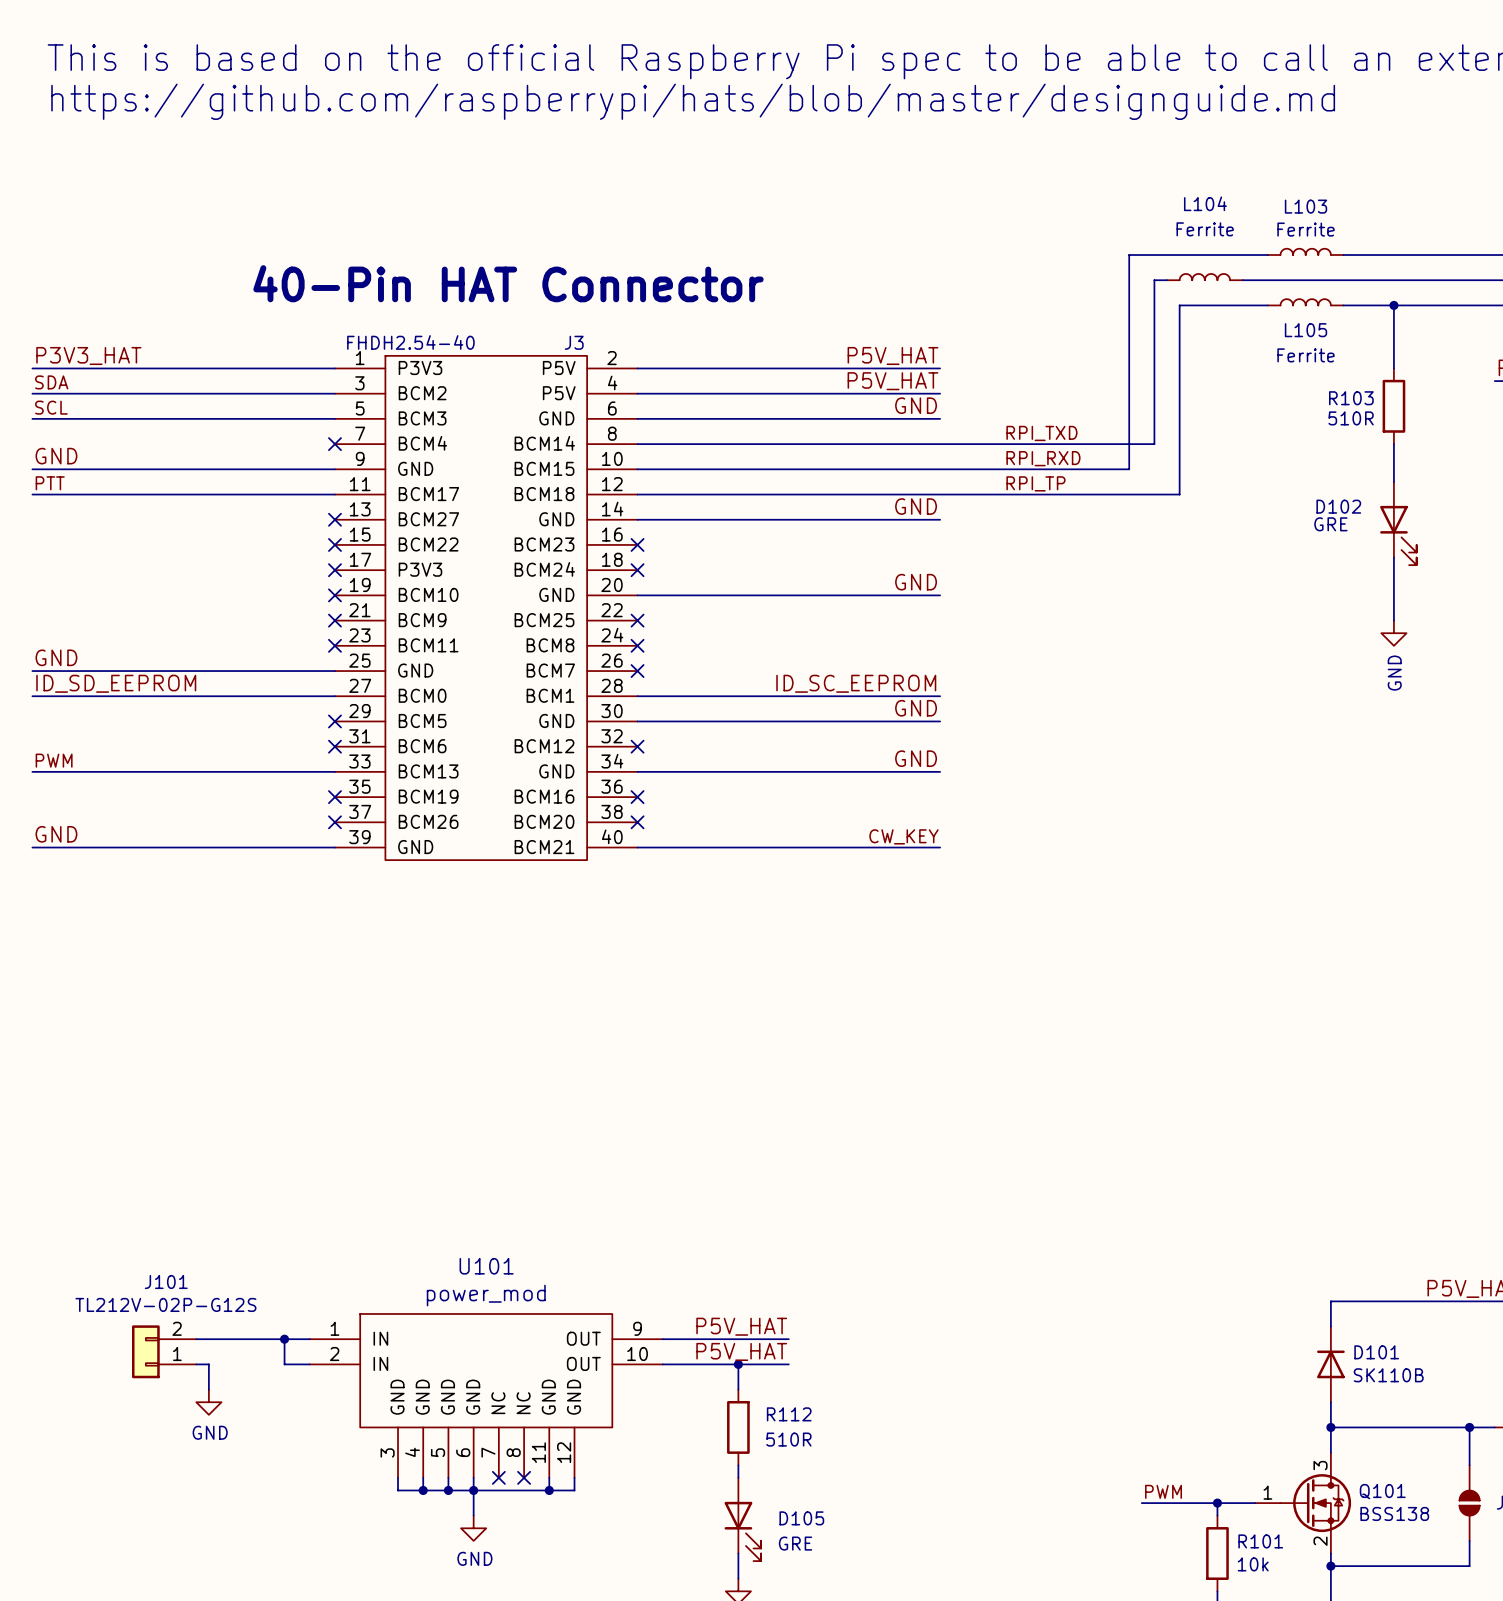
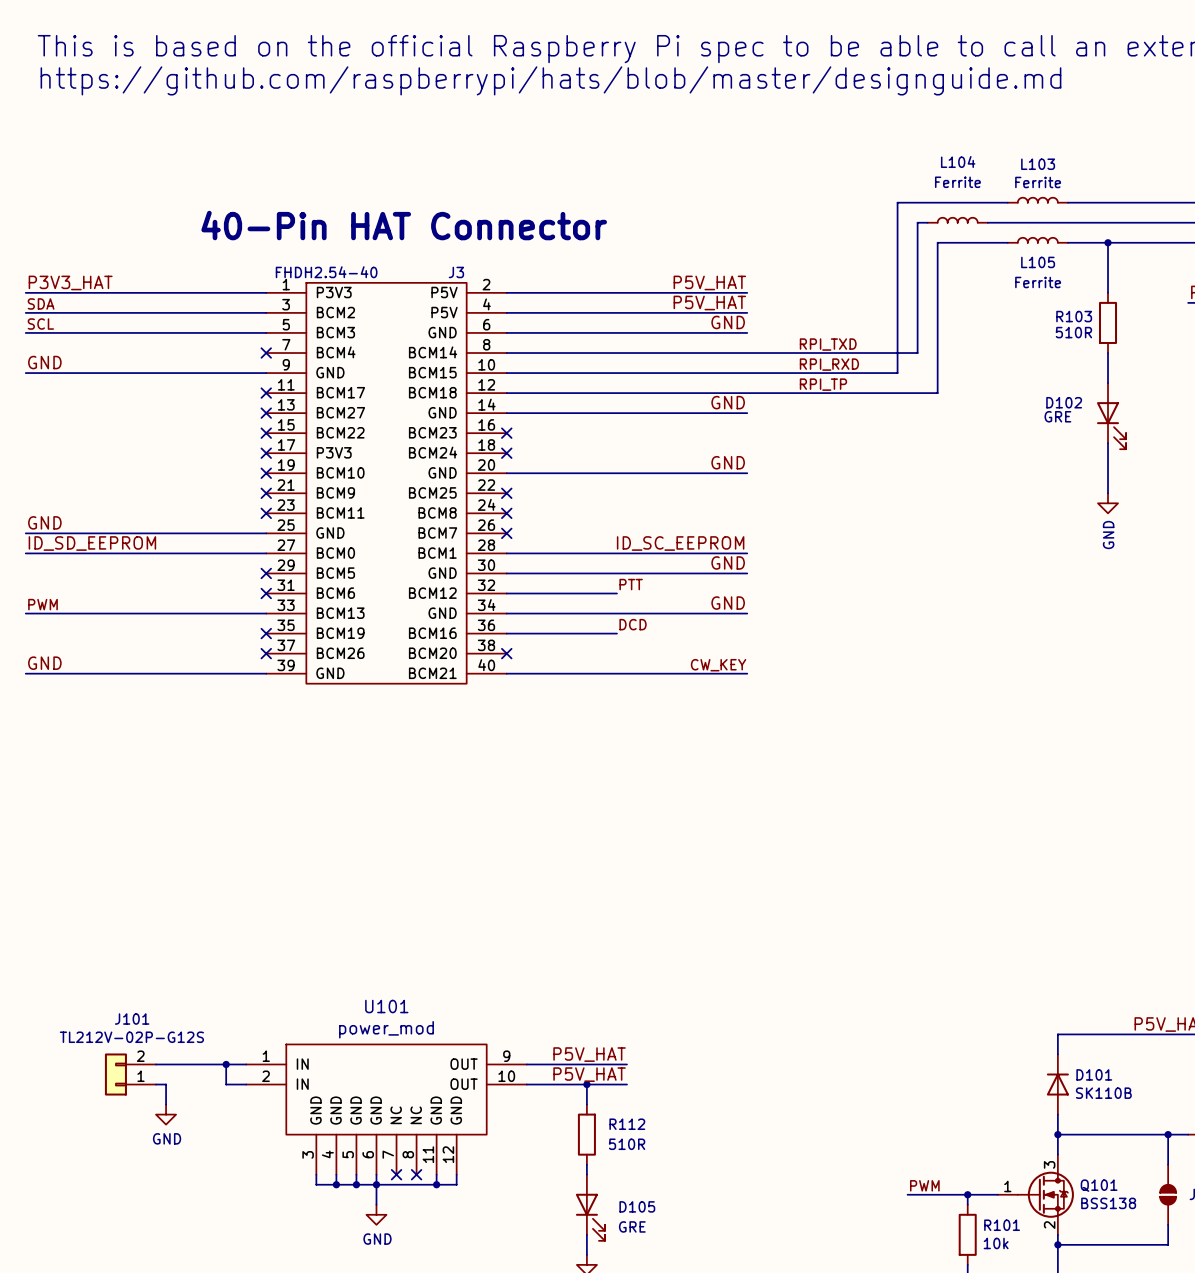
label: PTT (50, 483) -> none
wire: (32, 494) (334, 494) -> none
no-connect mark: none -> (266, 393)
label: none -> PTT (631, 584)
wire: none -> (506, 593) (616, 593)
no-connect mark: (637, 746) -> none
label: none -> DCD (633, 624)
wire: none -> (506, 633) (616, 633)
no-connect mark: (637, 797) -> none

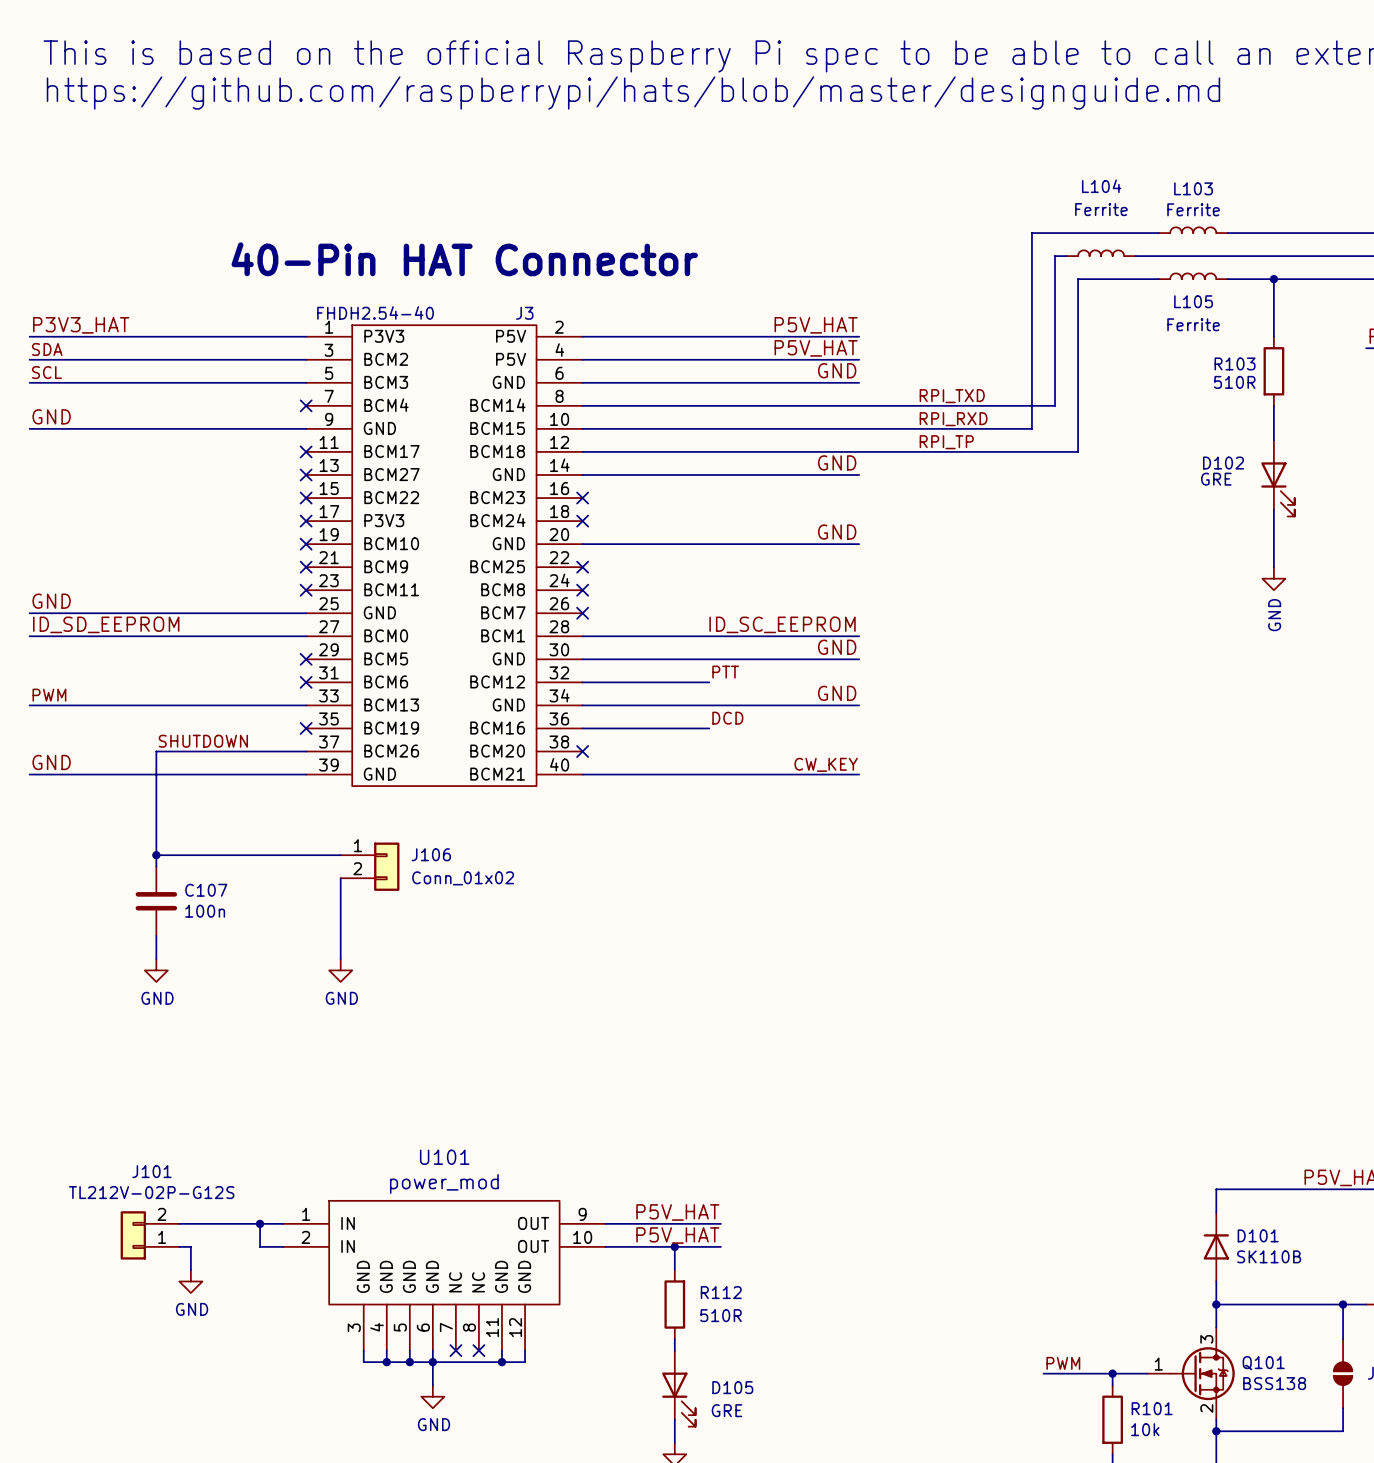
label: none -> SHUTDOWN (203, 741)
wire: none -> (306, 751) (156, 751) (156, 866)
no-connect mark: (266, 653) -> none
wire: none -> (156, 855) (340, 855)
junction: none -> (156, 855)
J106: none -> Conn_01x02 (370, 866)
wire: none -> (340, 878) (340, 958)
C107: none -> 100n (156, 901)
wire: none -> (156, 935) (156, 958)
power symbol: none -> GND (156, 970)
power symbol: none -> GND (340, 970)

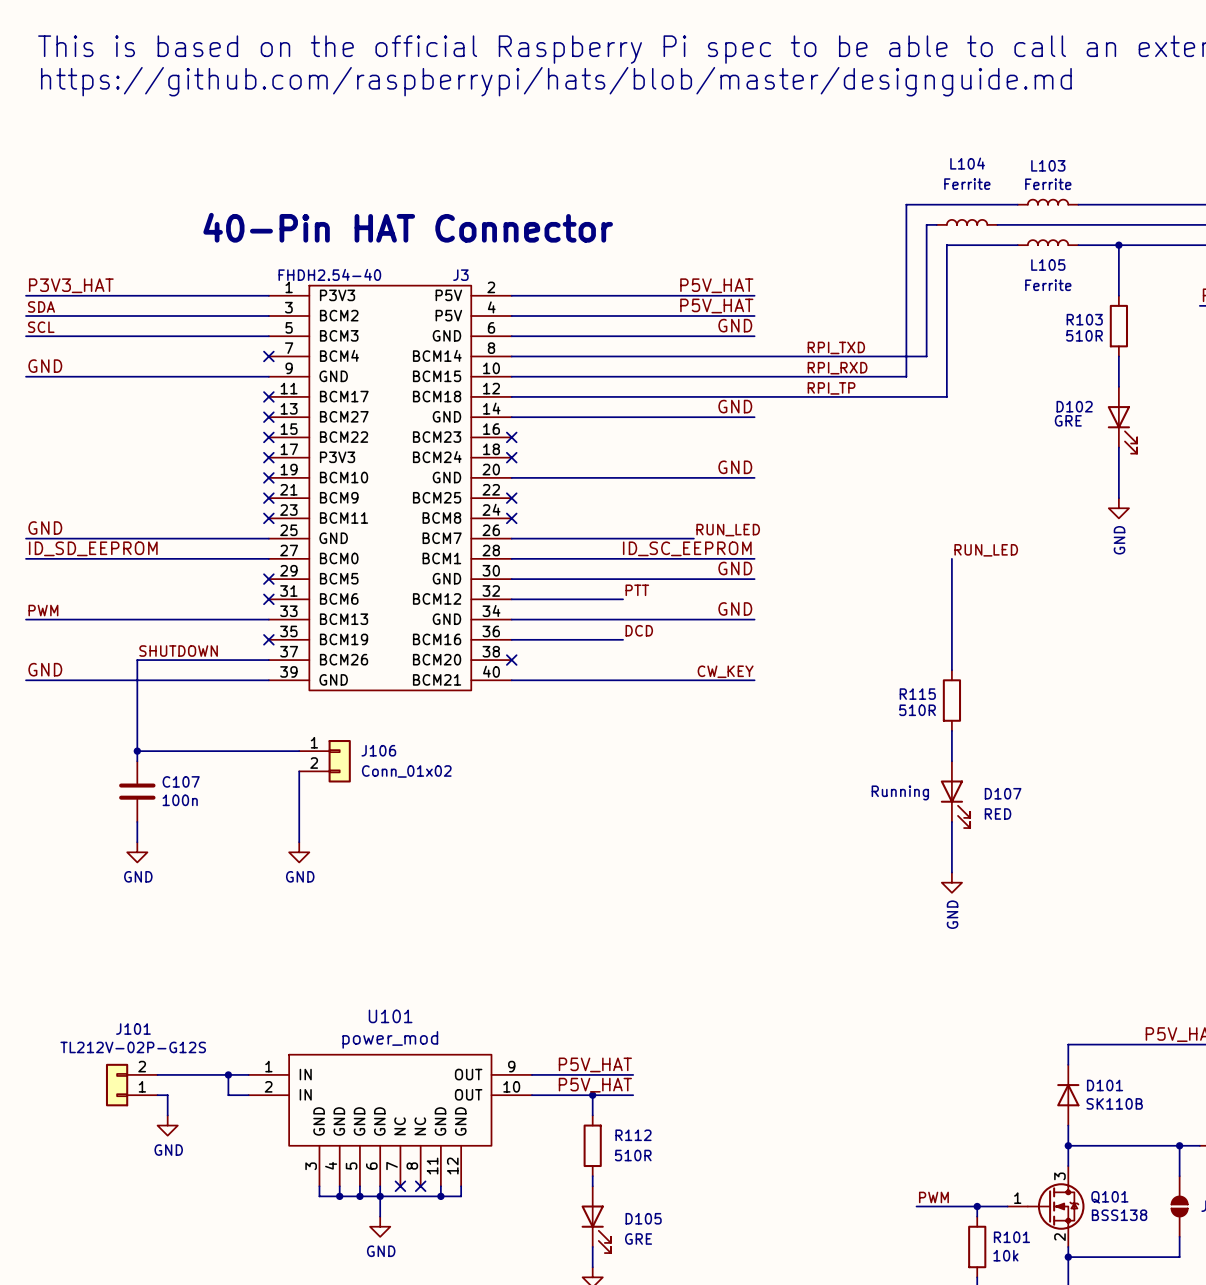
label: none -> RUN_LED (728, 530)
wire: none -> (511, 538) (693, 538)
no-connect mark: (582, 613) -> none
label: none -> RUN_LED (986, 550)
wire: none -> (951, 558) (951, 670)
R115: none -> 510R (951, 700)
wire: none -> (951, 730) (951, 761)
text: none -> Running (900, 792)
D107: none -> RED (955, 794)
wire: none -> (951, 821) (951, 872)
power symbol: none -> GND (951, 882)

